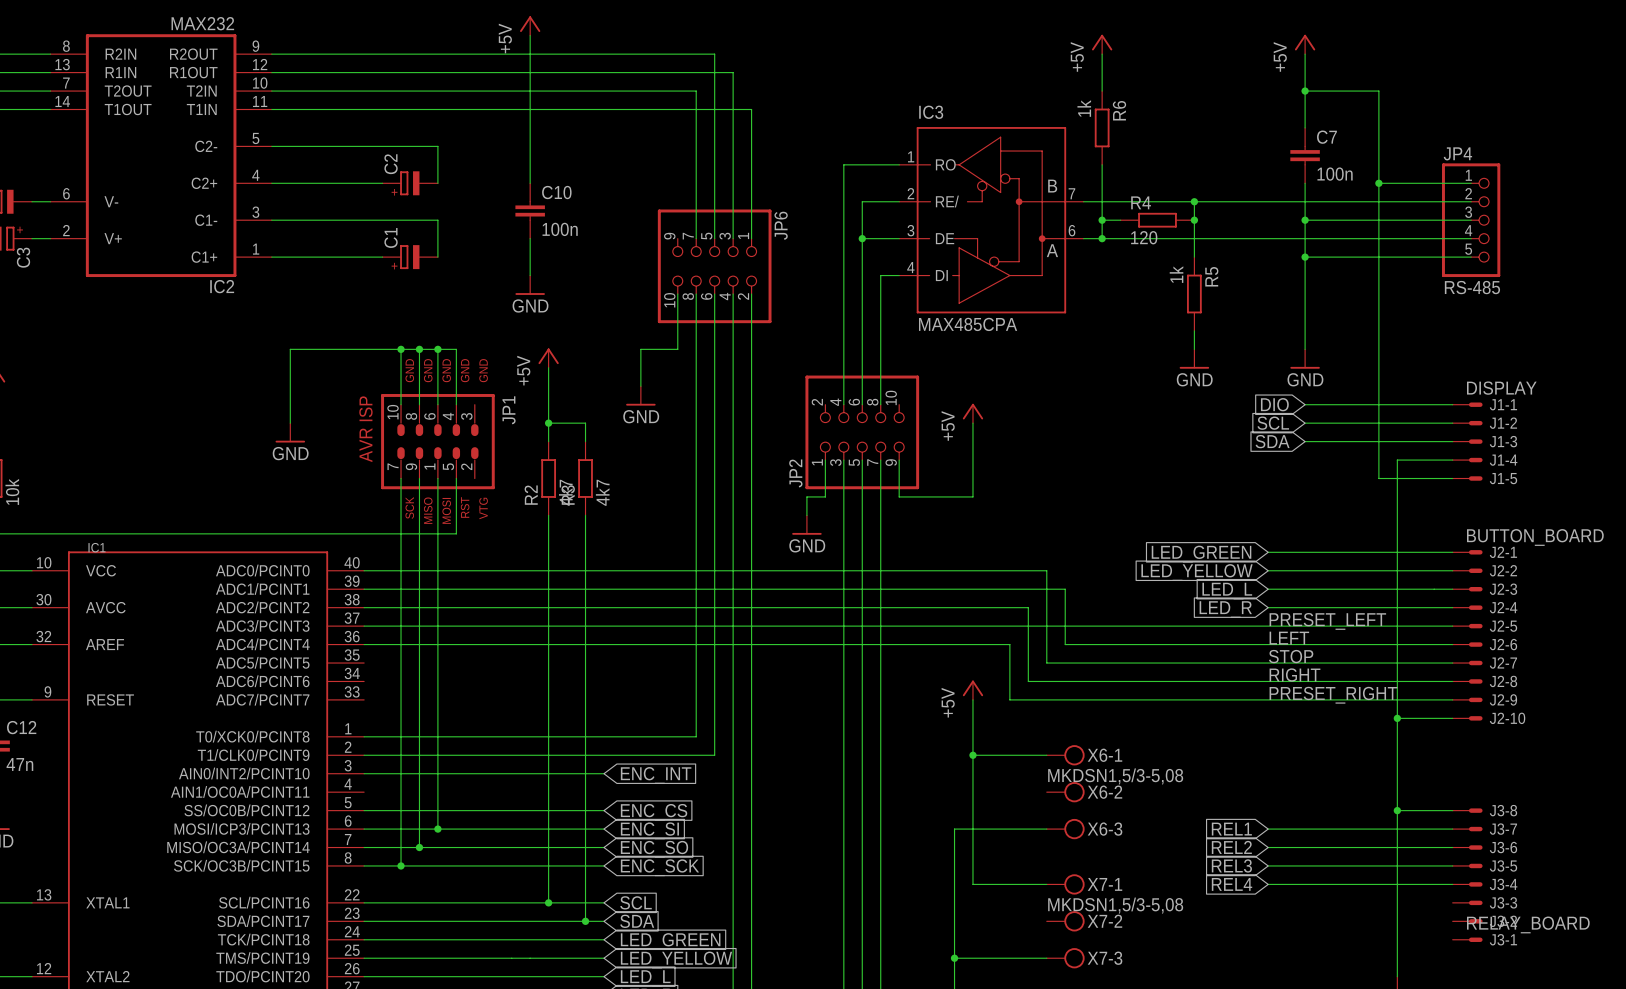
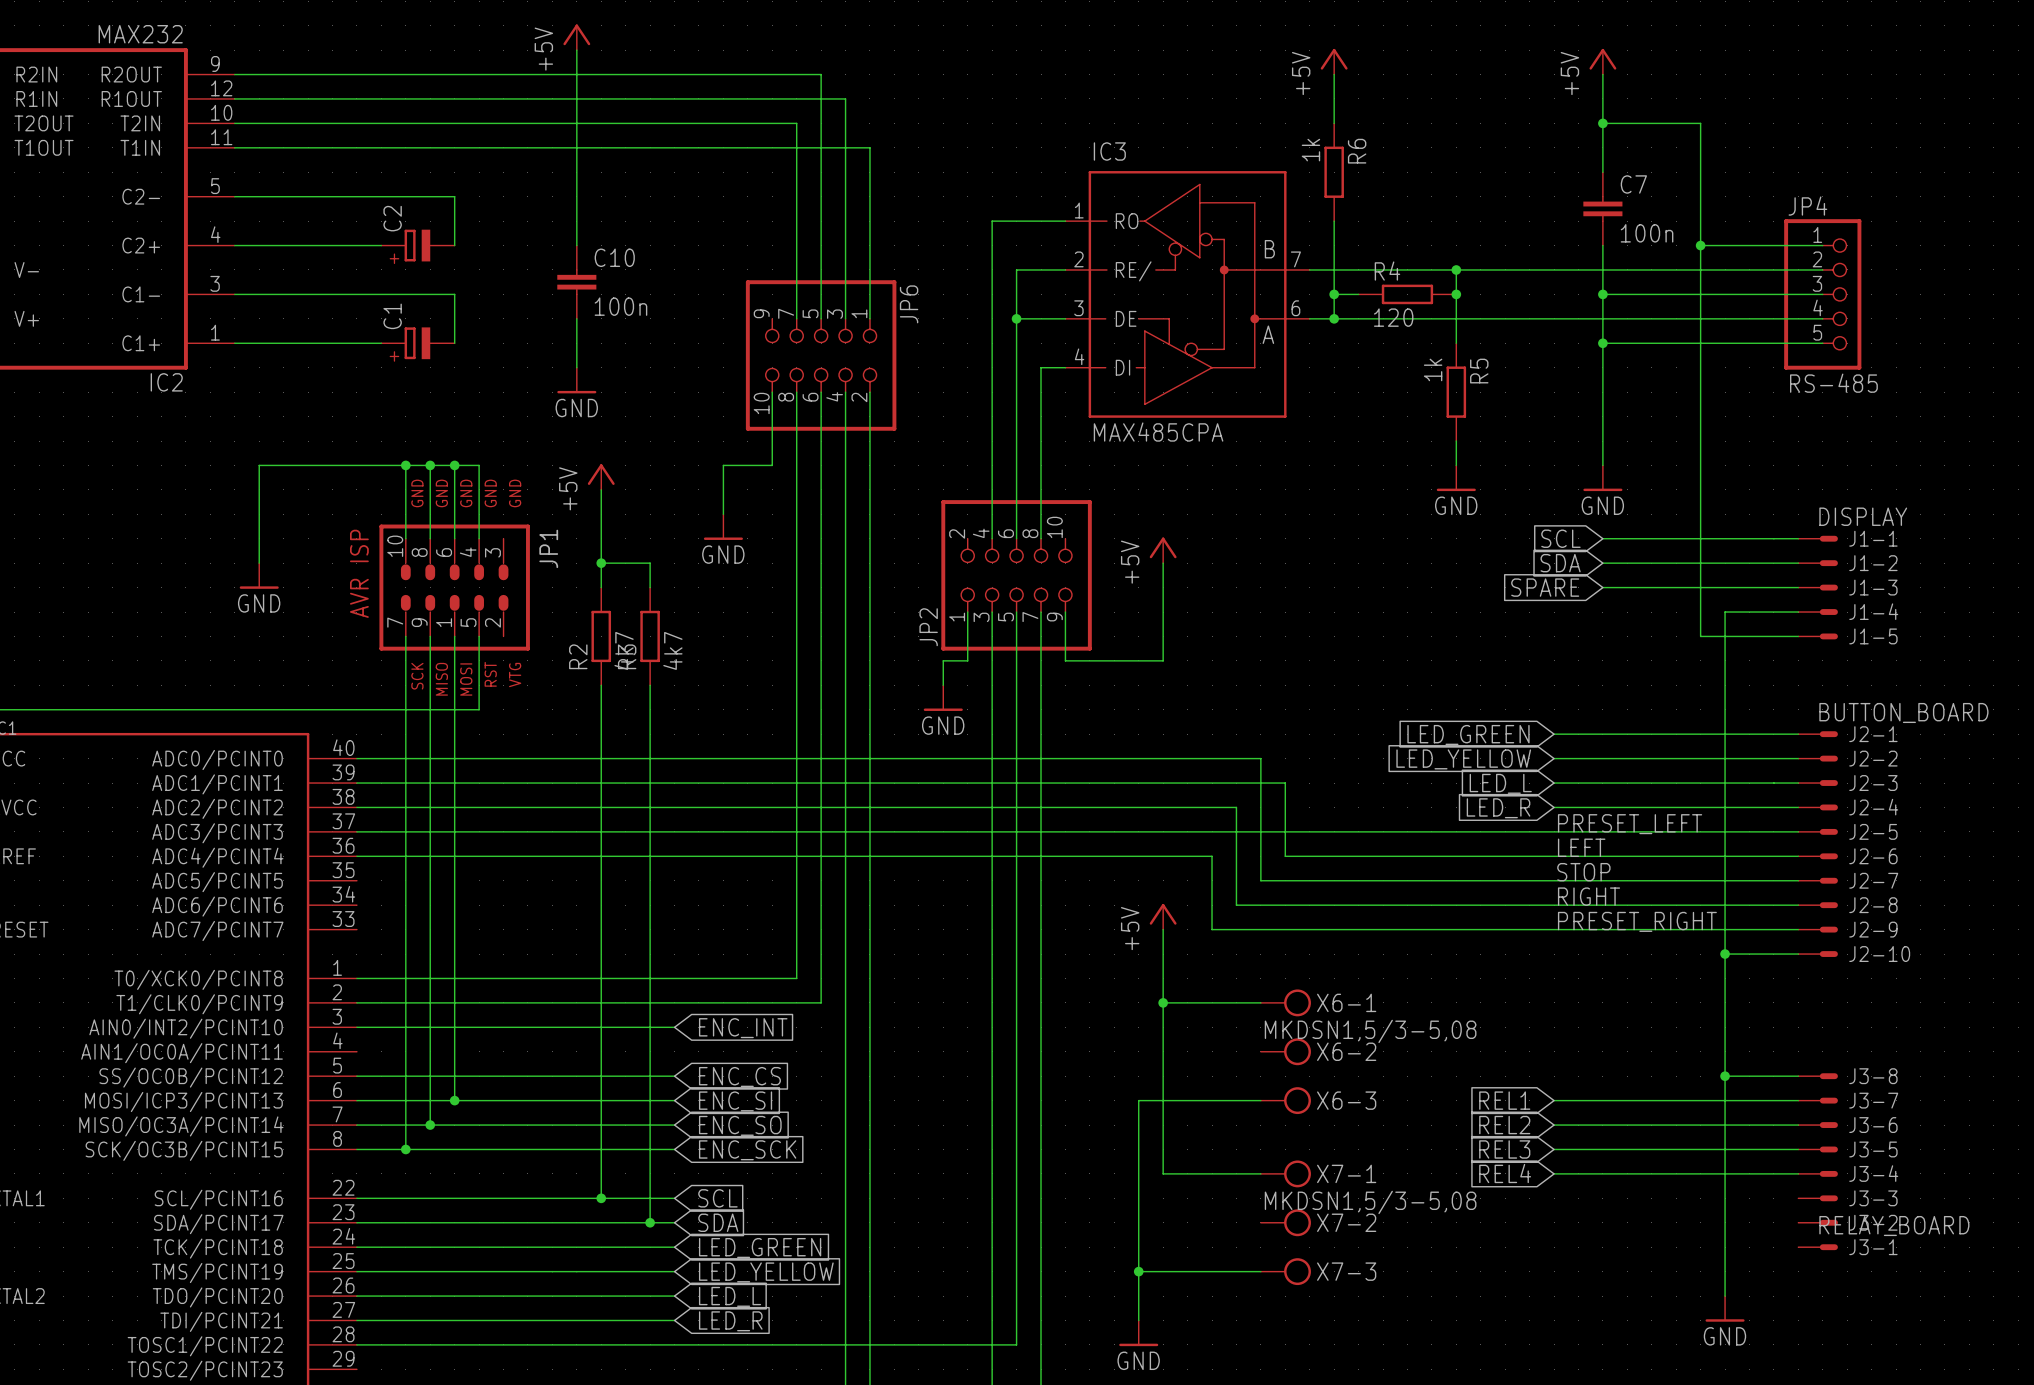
global label: DIO (1274, 404) -> SCL (1560, 538)
global label: SCL (1273, 423) -> SDA (1560, 563)
global label: SDA (1272, 441) -> SPARE (1545, 587)

